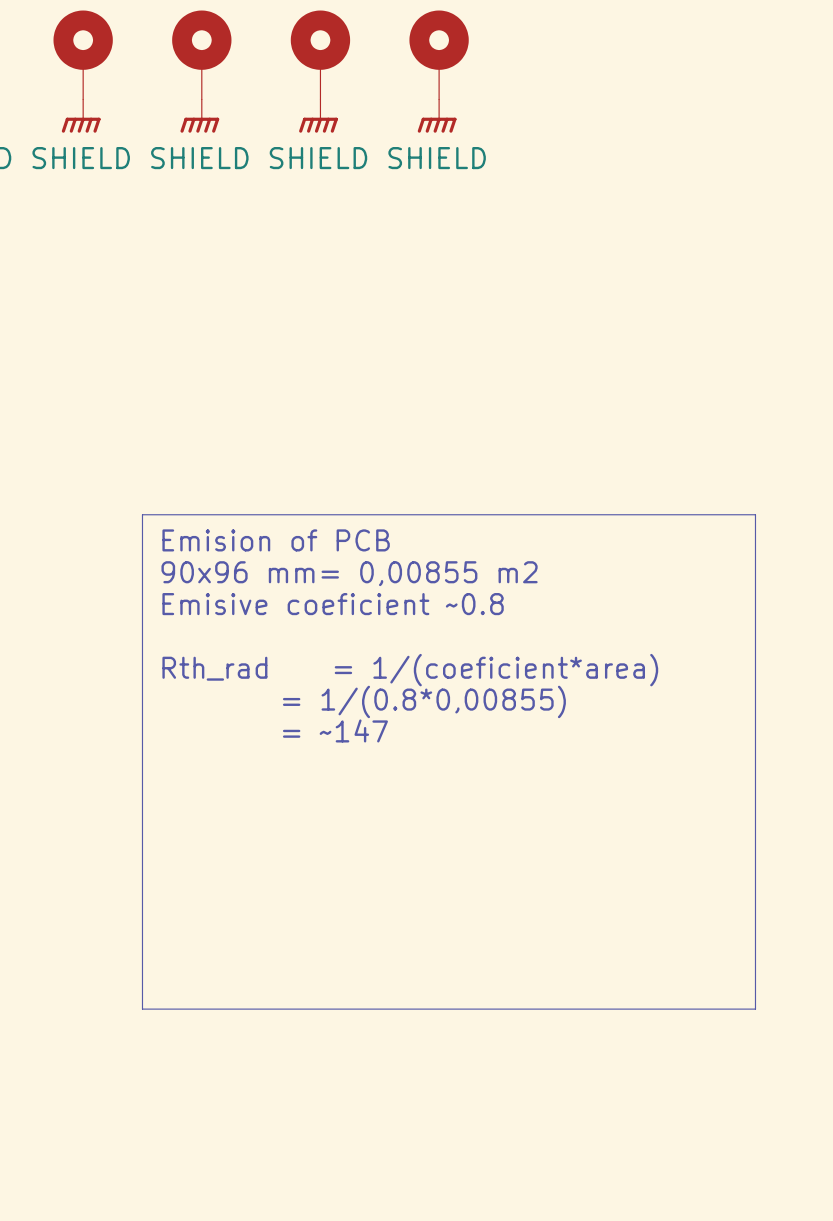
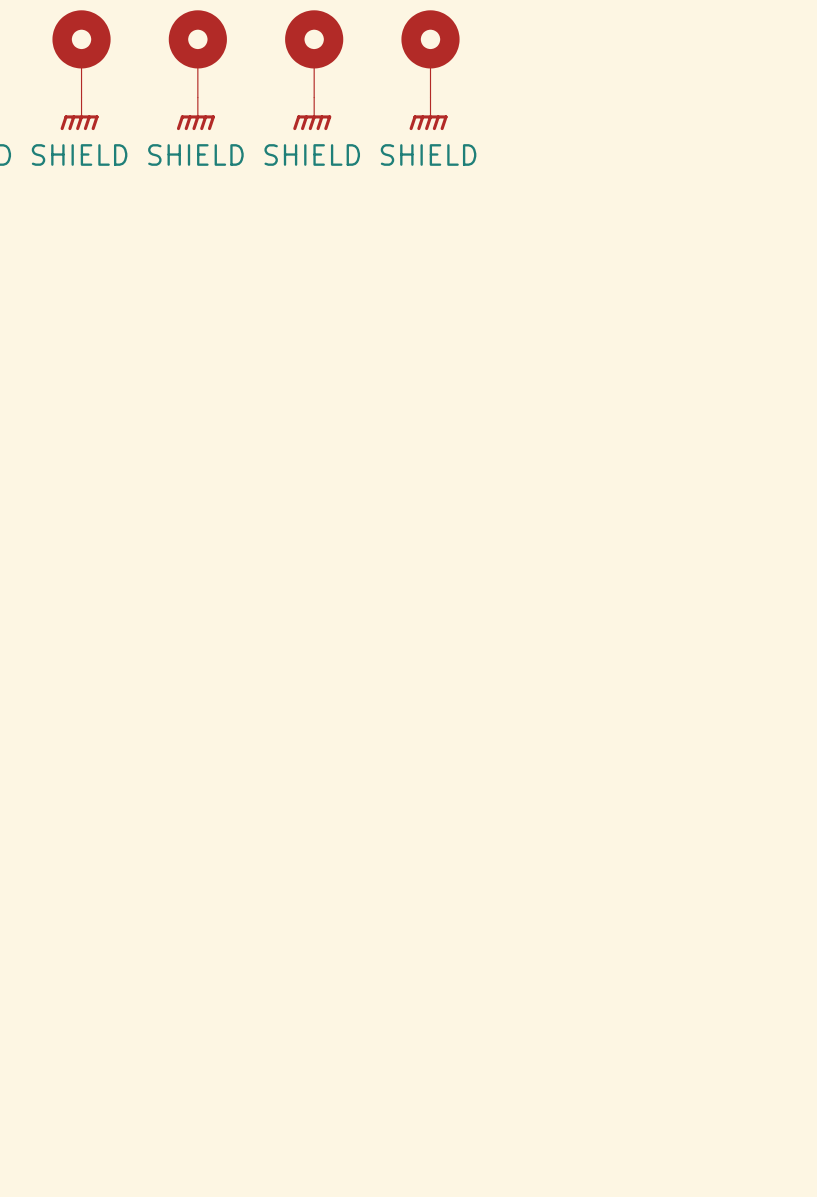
line: (142, 514) (755, 514) (755, 1009) (142, 1009) (142, 514) -> none
text: Emision of PCB (276, 540) -> none
text: 90x96 mm= 0,00855 m2 (349, 573) -> none
text: Emisive coeficient ~0.8 (333, 604) -> none
text: Rth_rad = 1/(coeficient*area) (410, 670) -> none
text: = 1/(0.8*0,00855) (424, 701) -> none
text: = ~147 (335, 730) -> none

